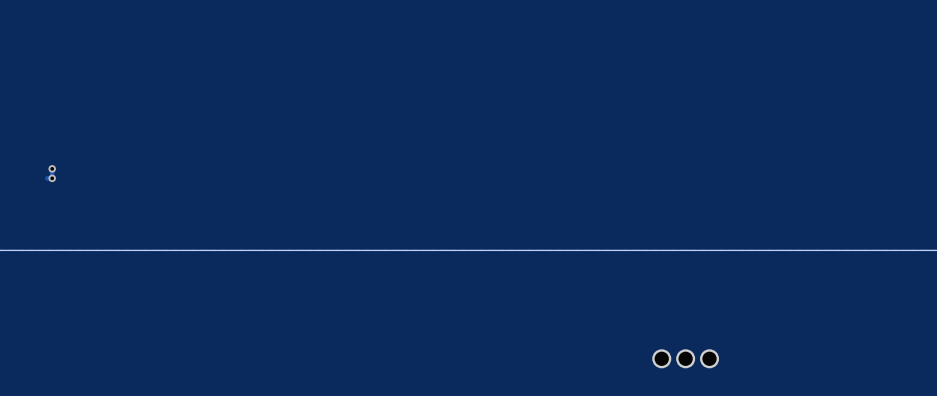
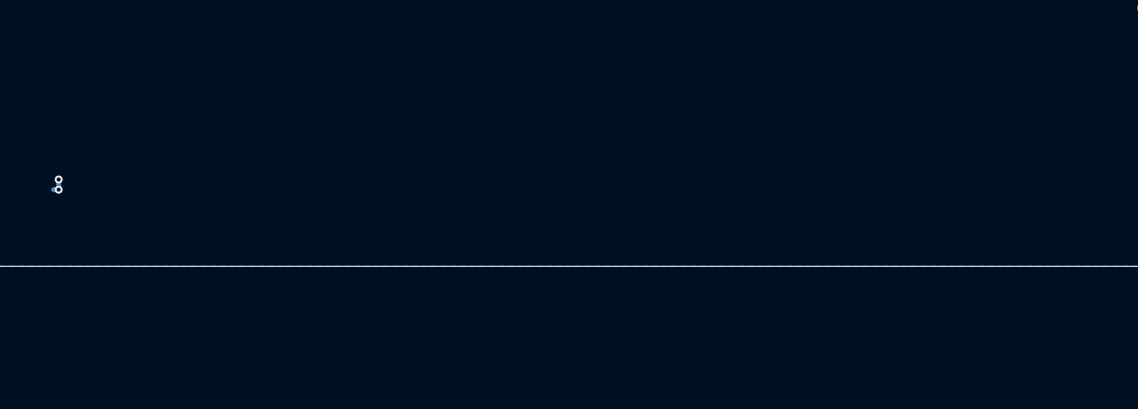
part: (685, 358) -> none

